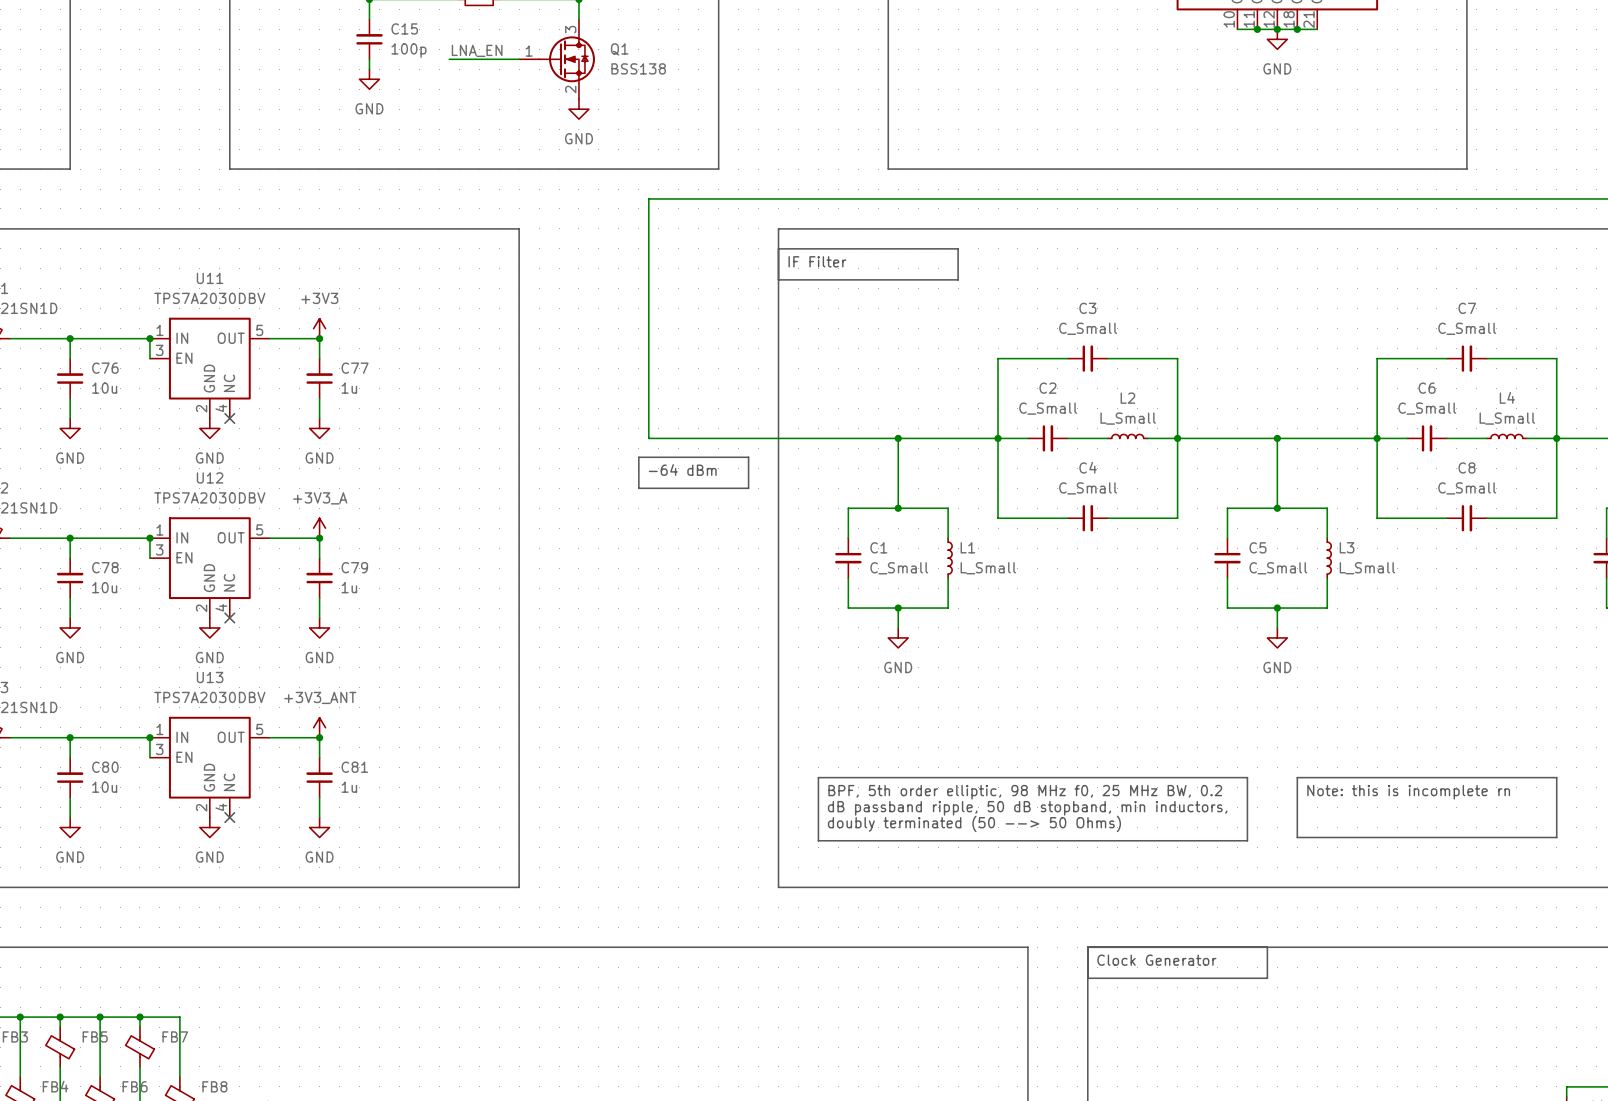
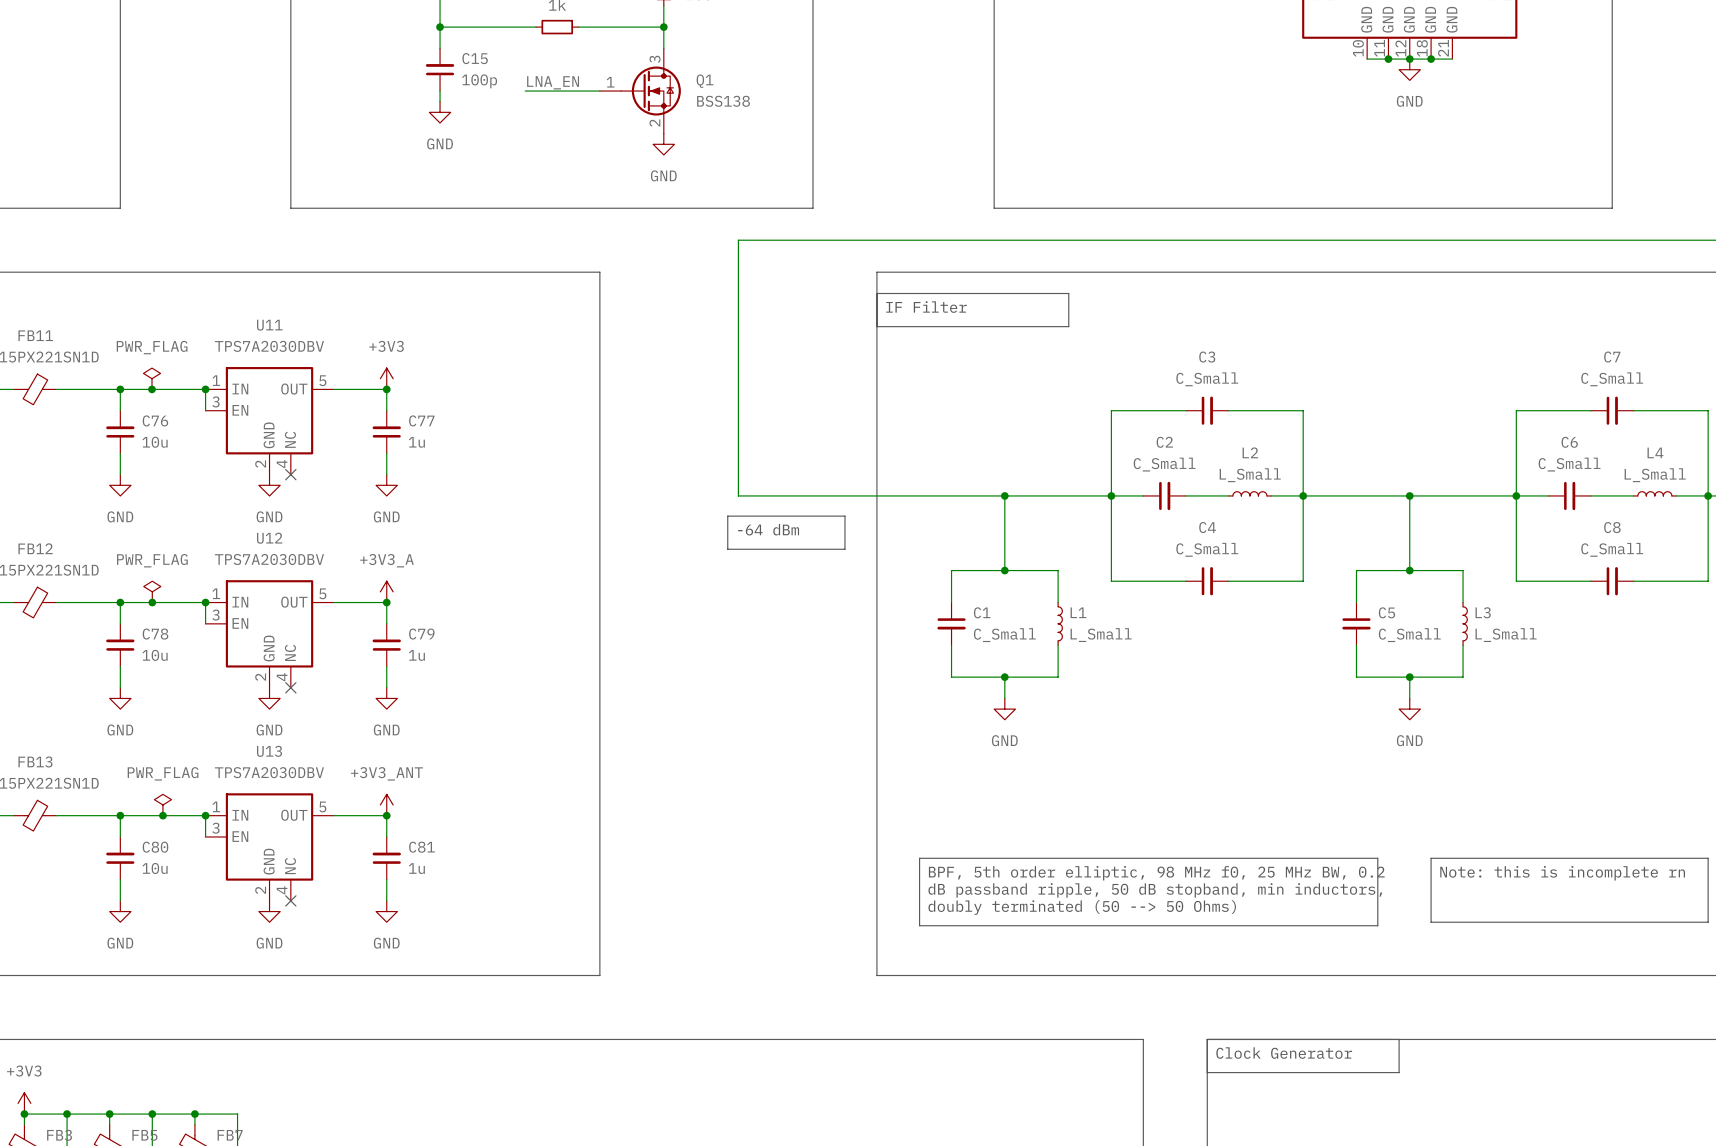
power symbol: none -> PWR_FLAG (152, 378)
junction: none -> (152, 389)
power symbol: none -> PWR_FLAG (152, 591)
junction: none -> (152, 602)
power symbol: none -> PWR_FLAG (162, 805)
junction: none -> (162, 815)

